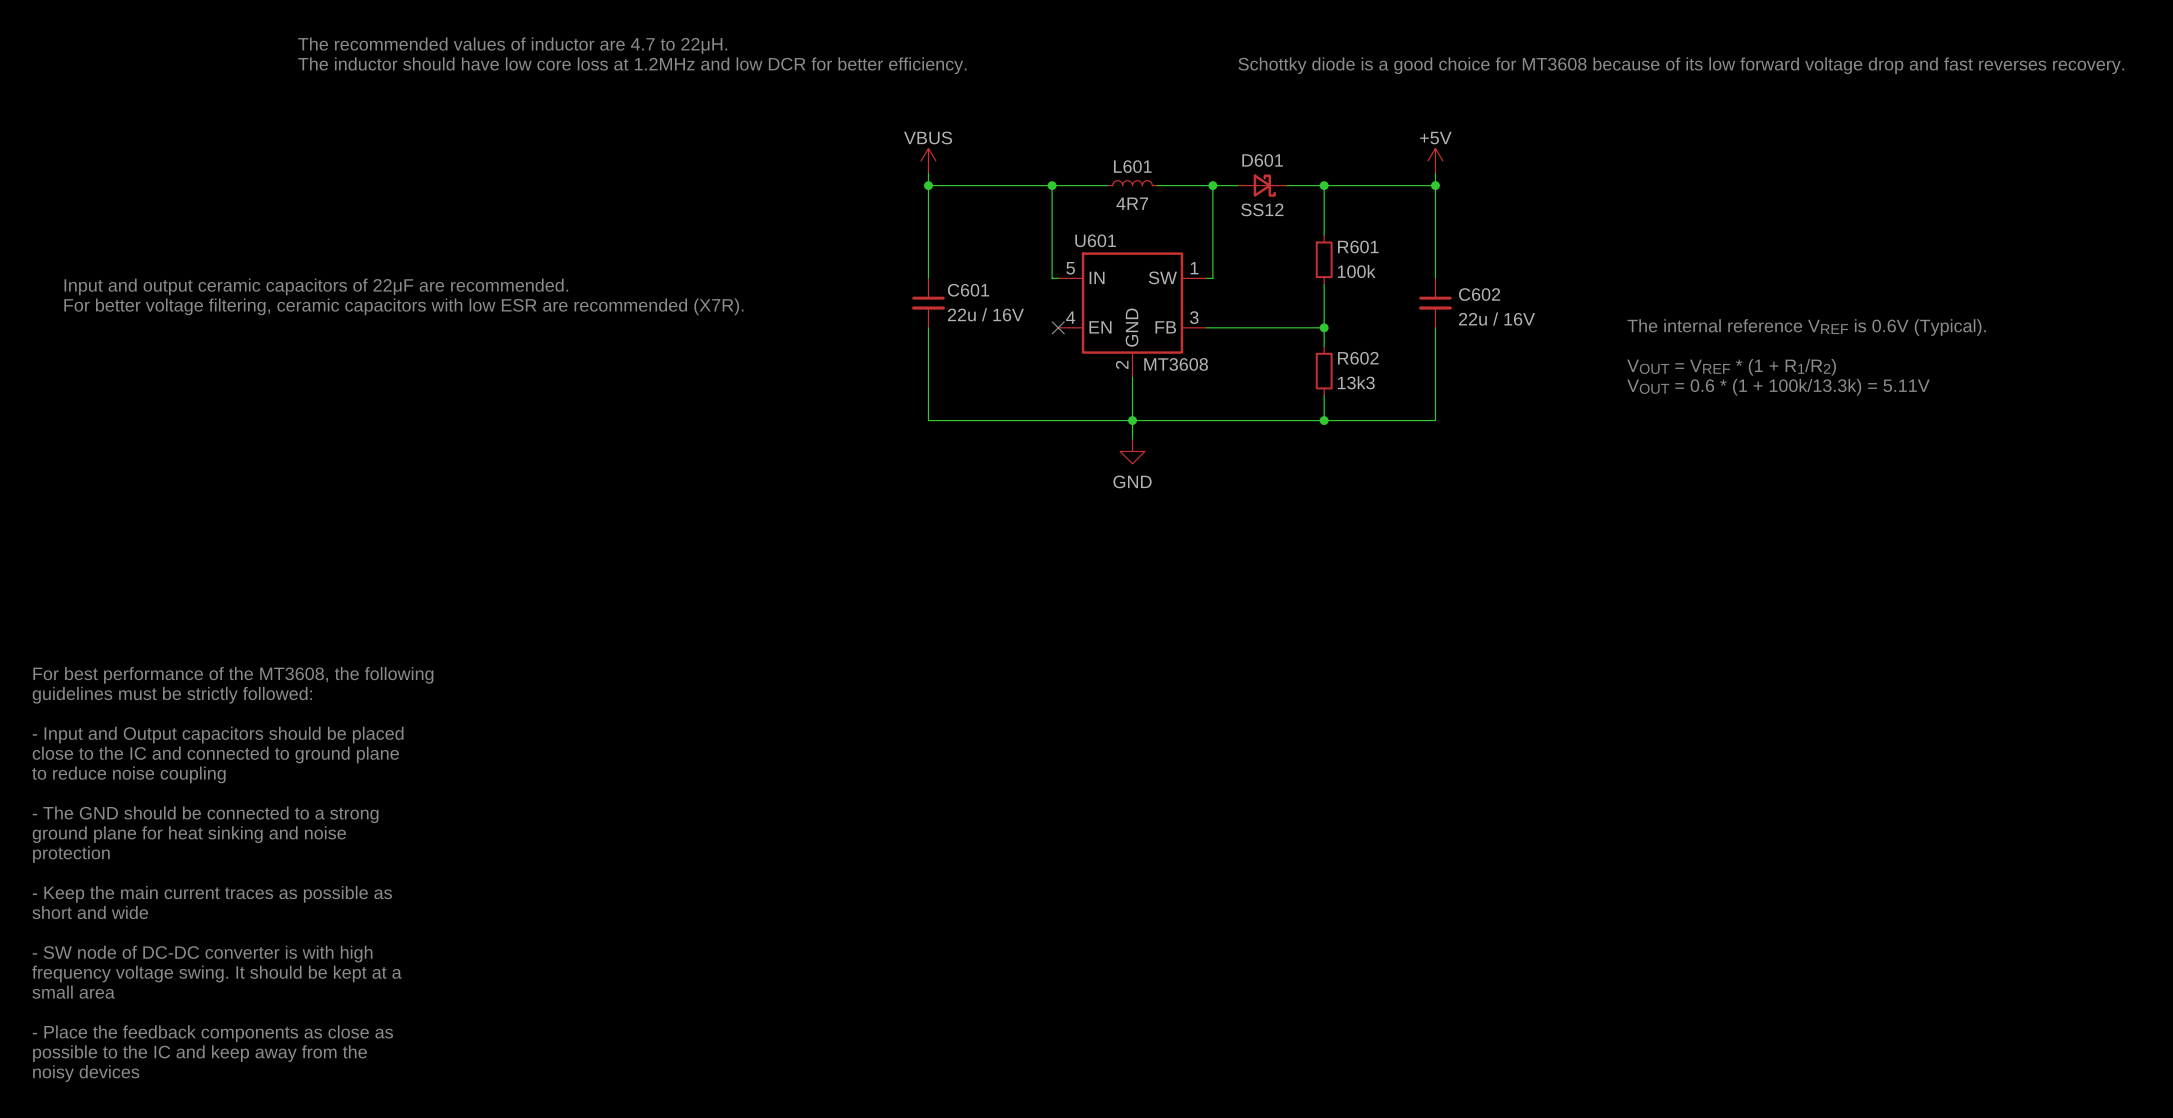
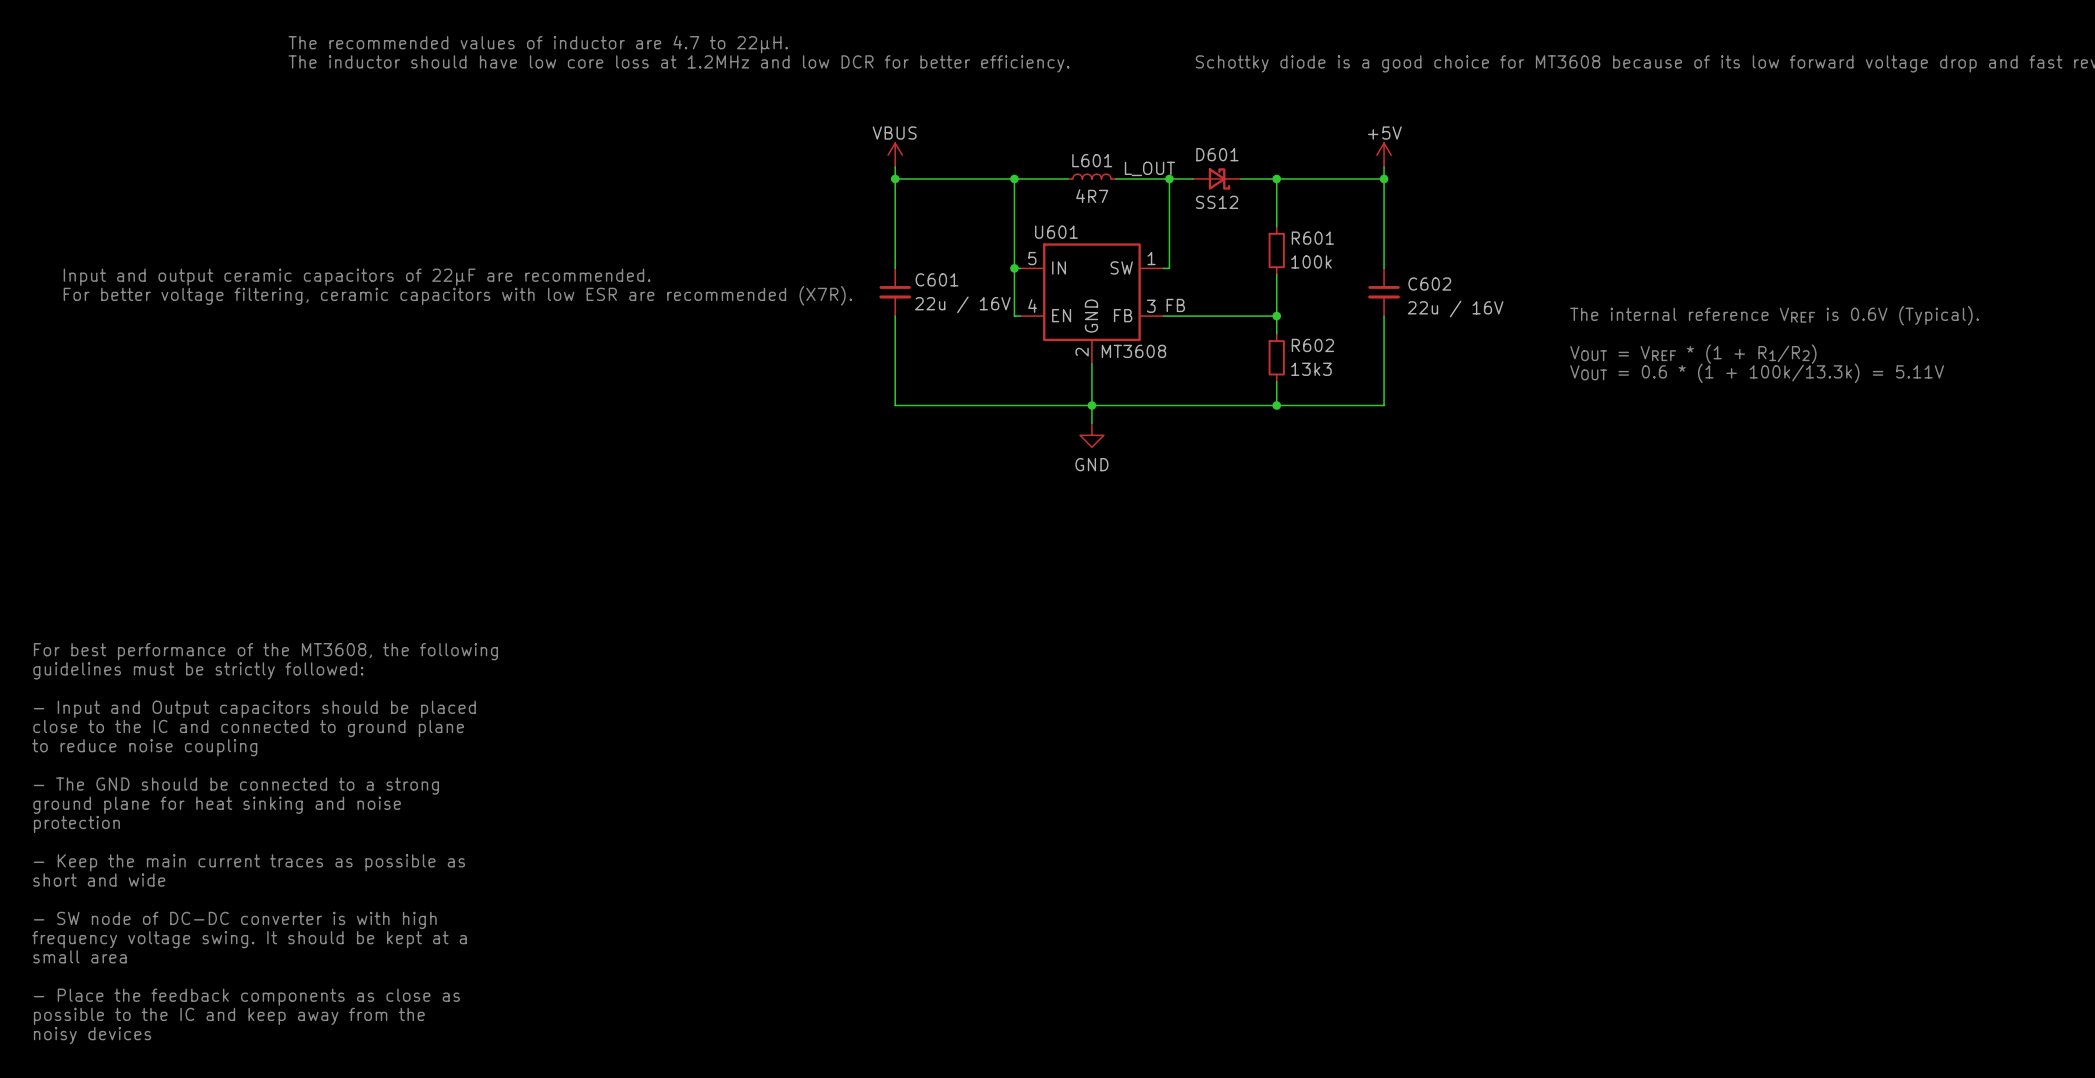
label: none -> L_OUT (1149, 168)
wire: none -> (1014, 268) (1014, 316) (1020, 316)
junction: none -> (1014, 268)
label: none -> FB (1175, 305)
no-connect mark: (1058, 327) -> none

